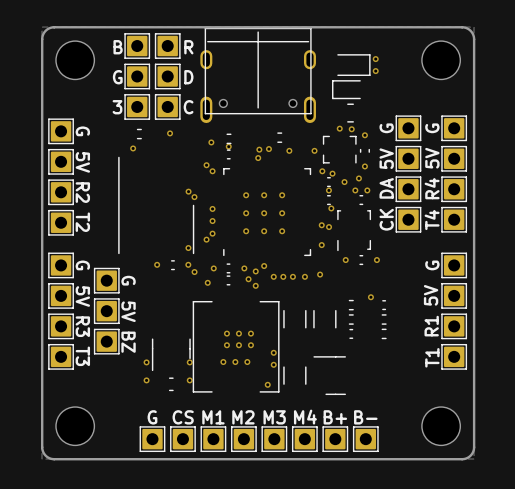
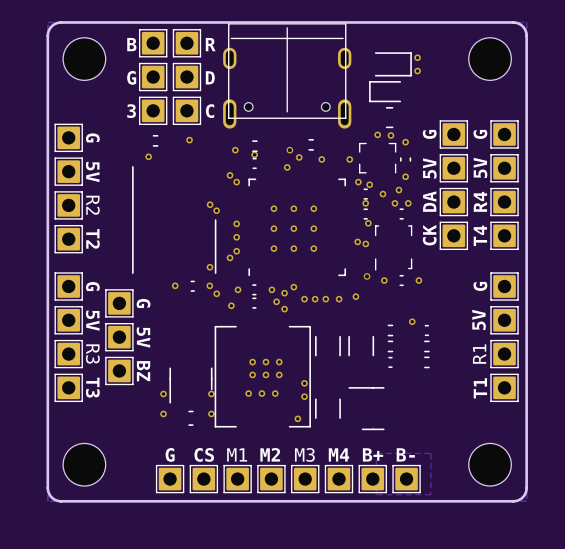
via: none -> (289, 150)
via: (259, 149) -> none
via: (321, 245) -> none
via: none -> (367, 276)
zone outline: none -> (376, 453) (376, 494) (430, 494) (430, 453) (376, 453)

